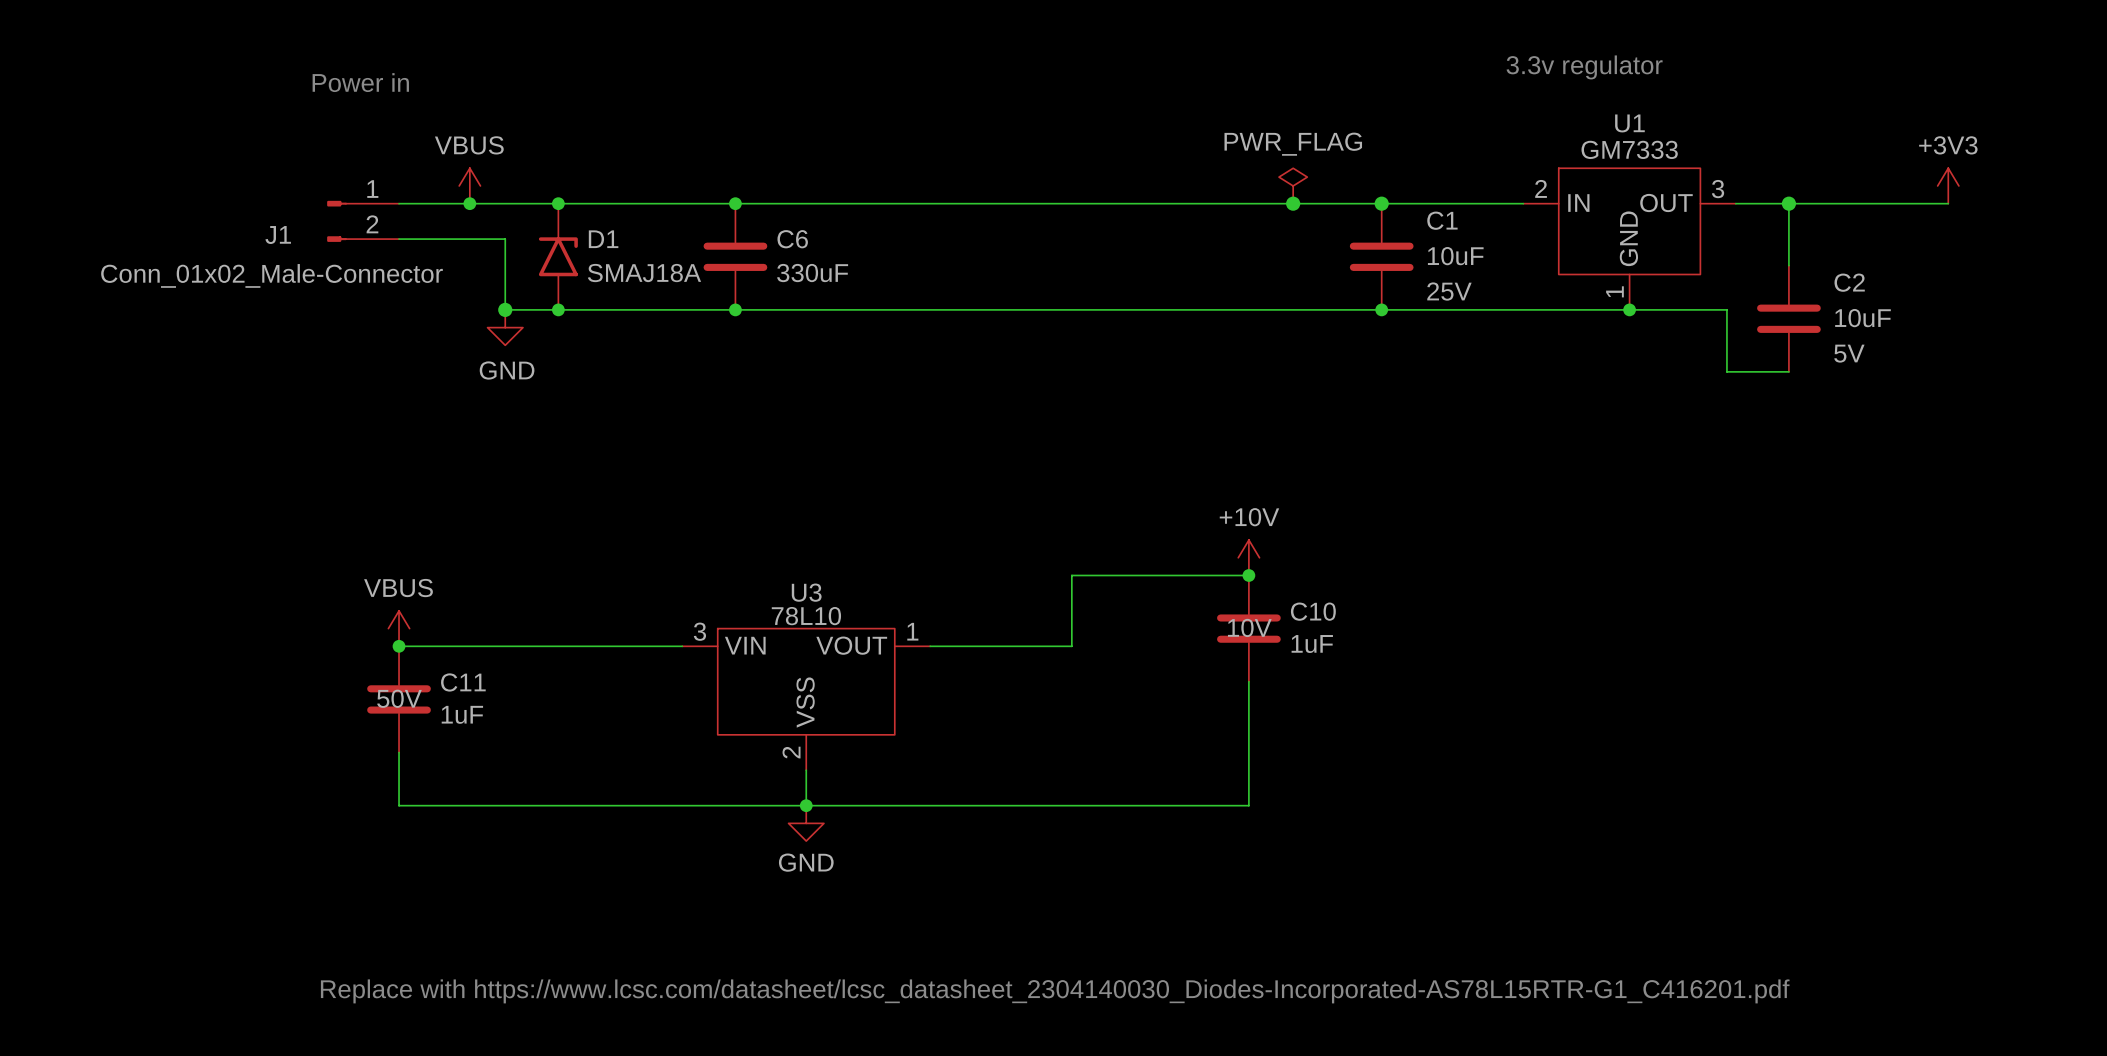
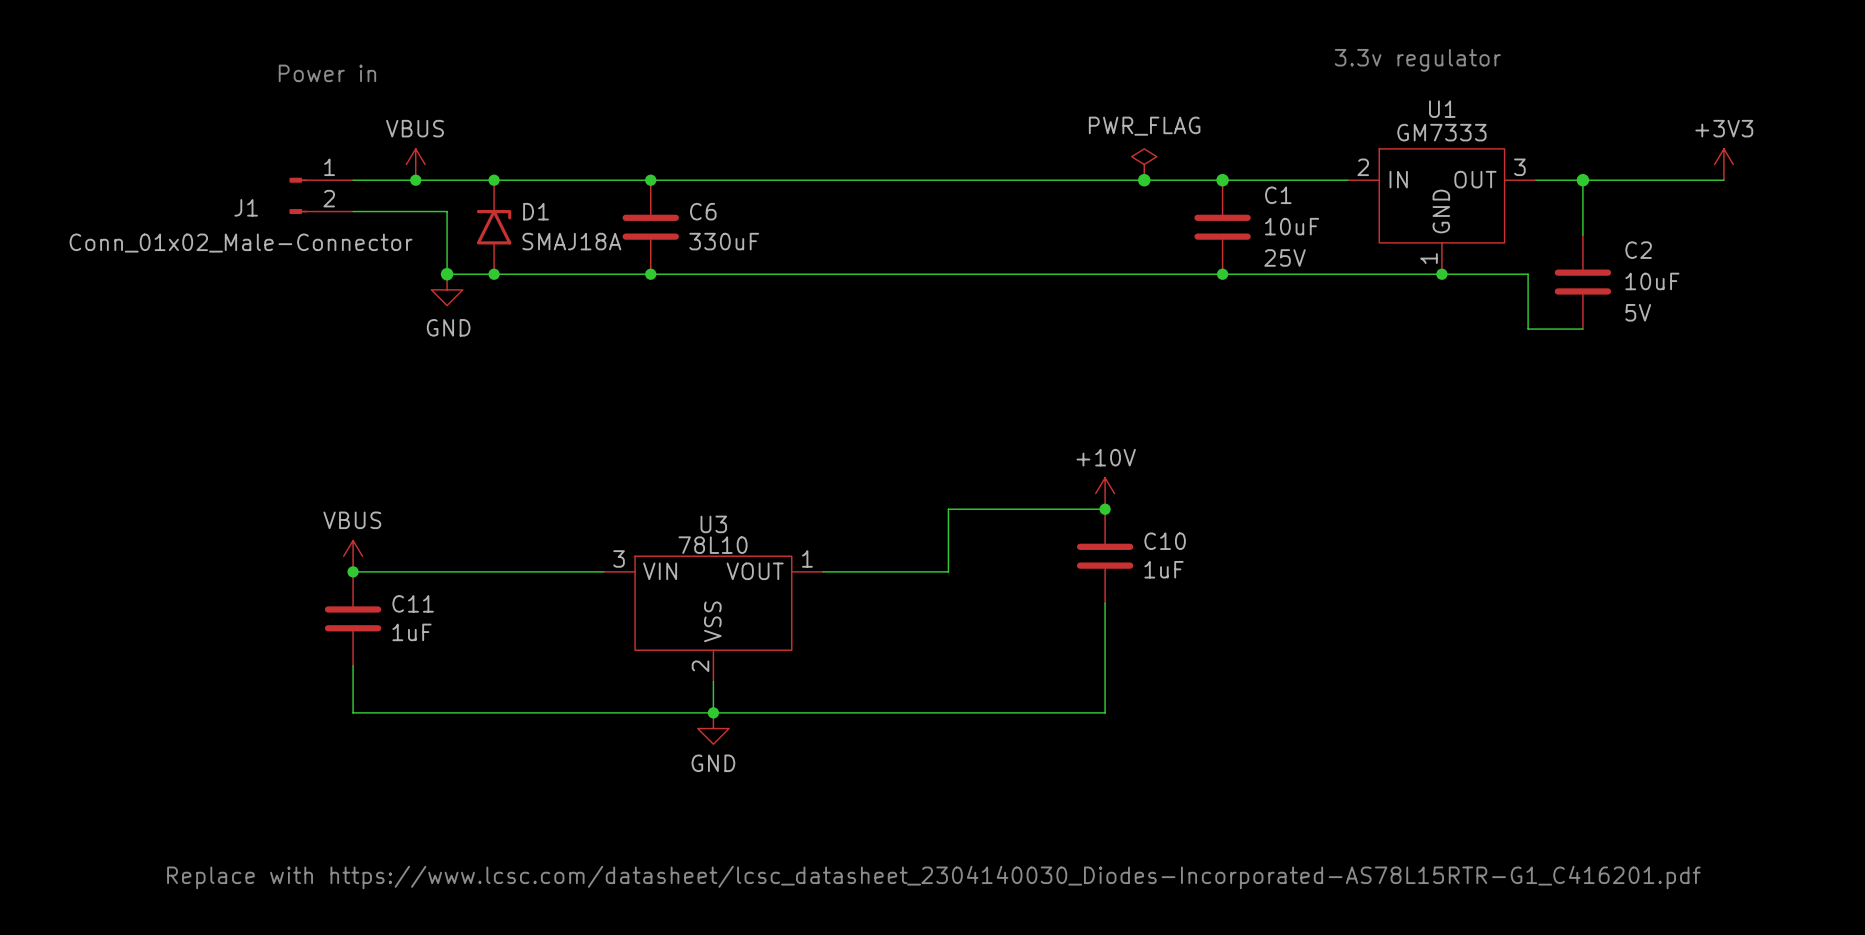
C10 text: 10V (1249, 627) -> none
C11 text: 50V (399, 698) -> none

